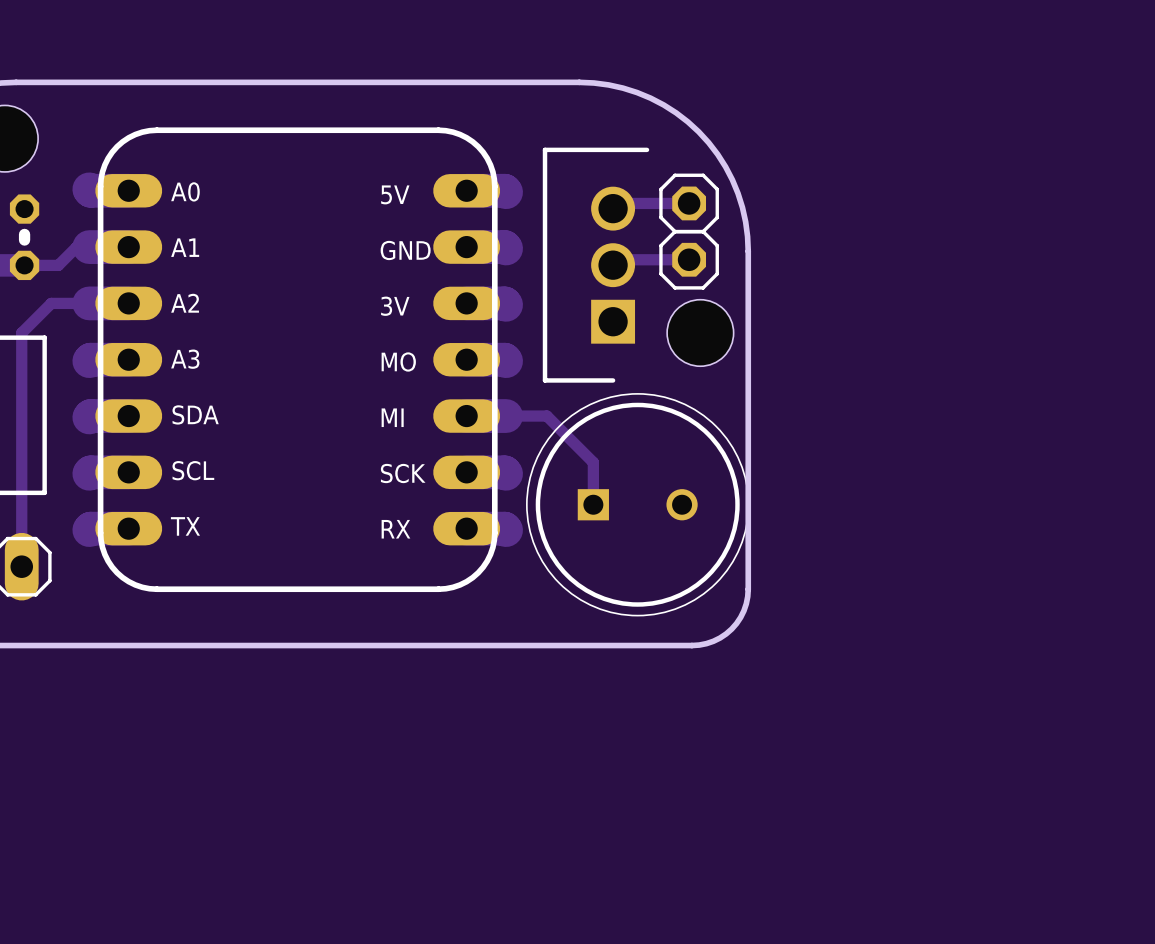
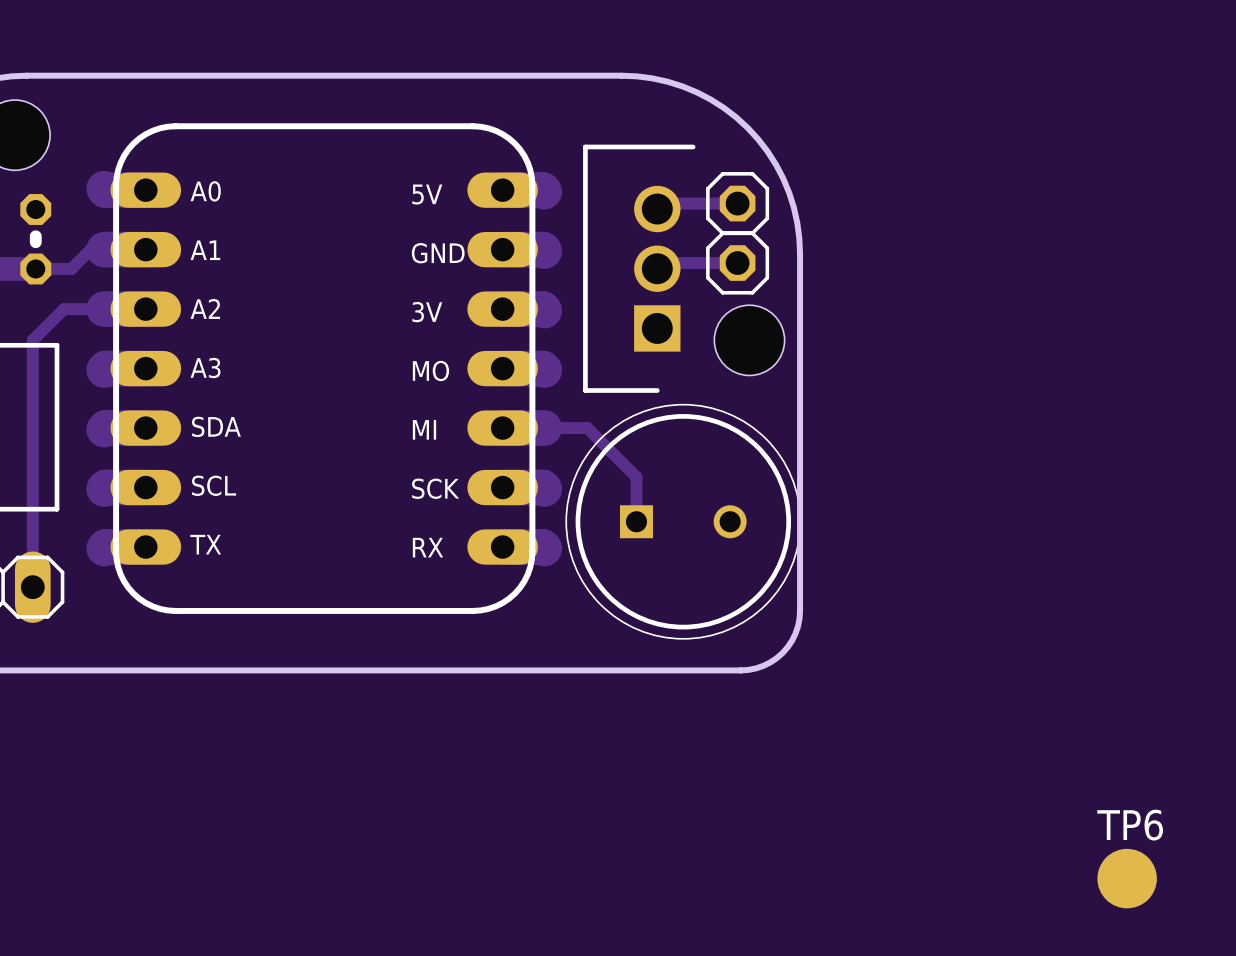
TP6: none -> (1127, 878)

